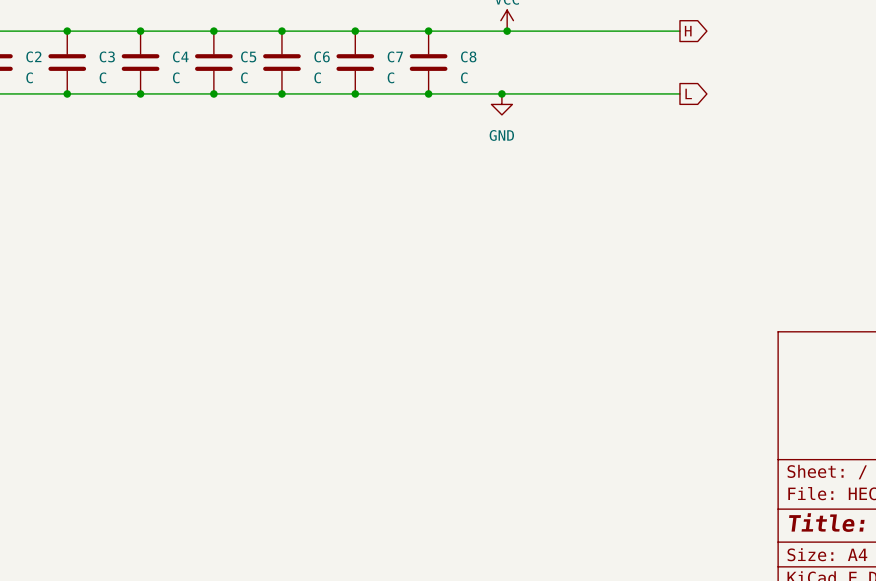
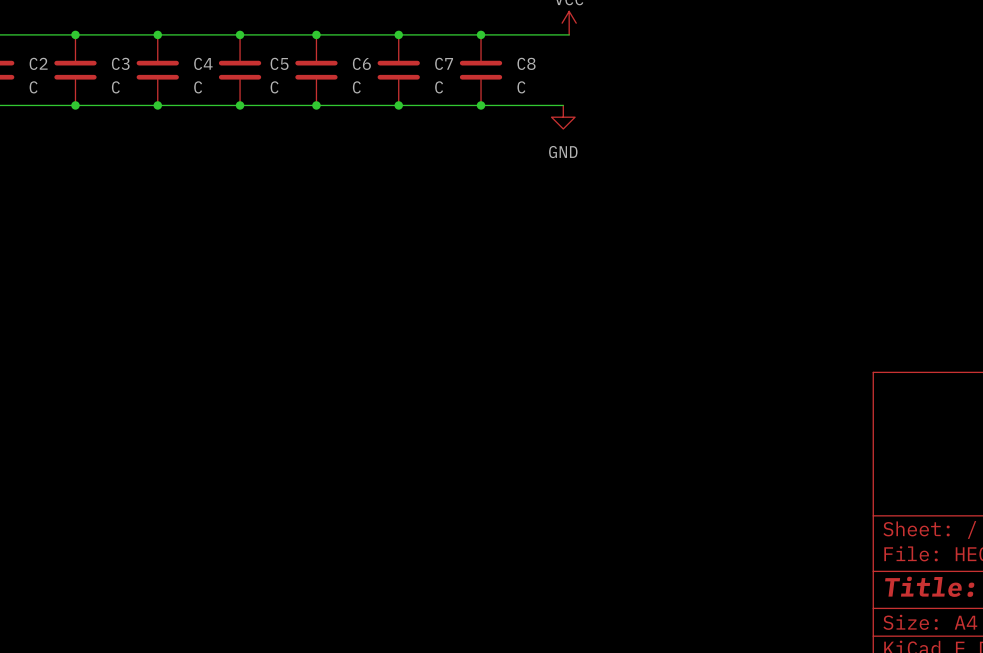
wire: (507, 31) (679, 31) -> none
junction: (507, 31) -> none
global label: H (688, 31) -> none
wire: (501, 93) (679, 93) -> none
junction: (501, 93) -> none
global label: L (688, 93) -> none

